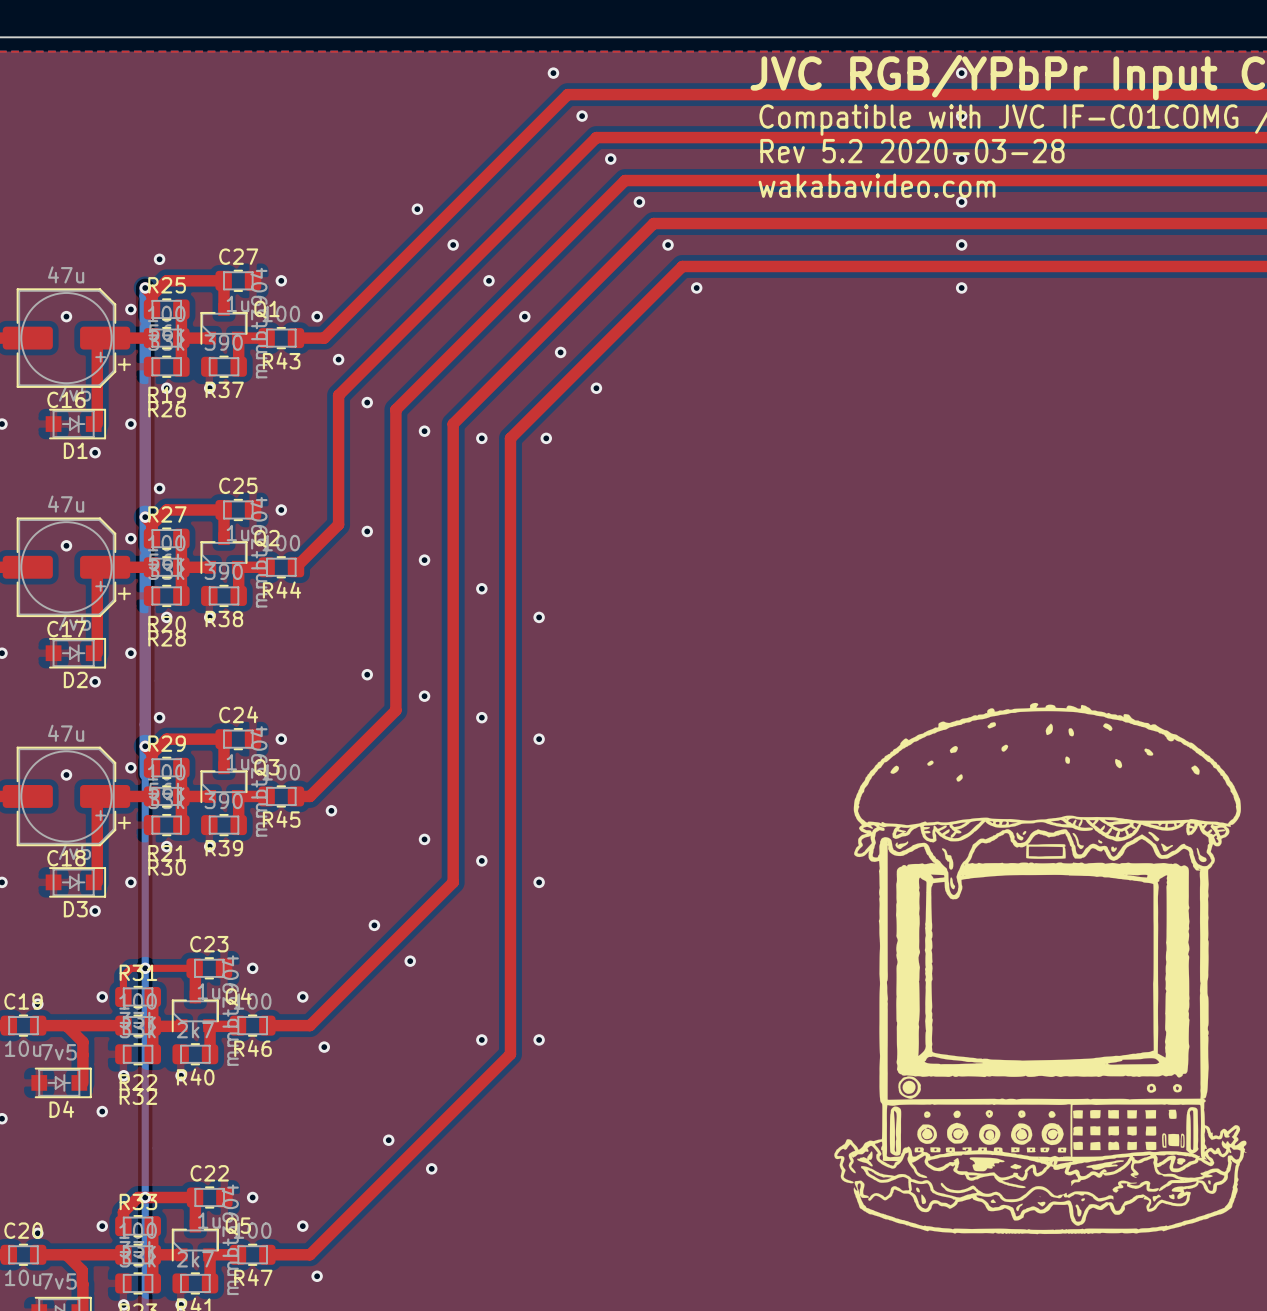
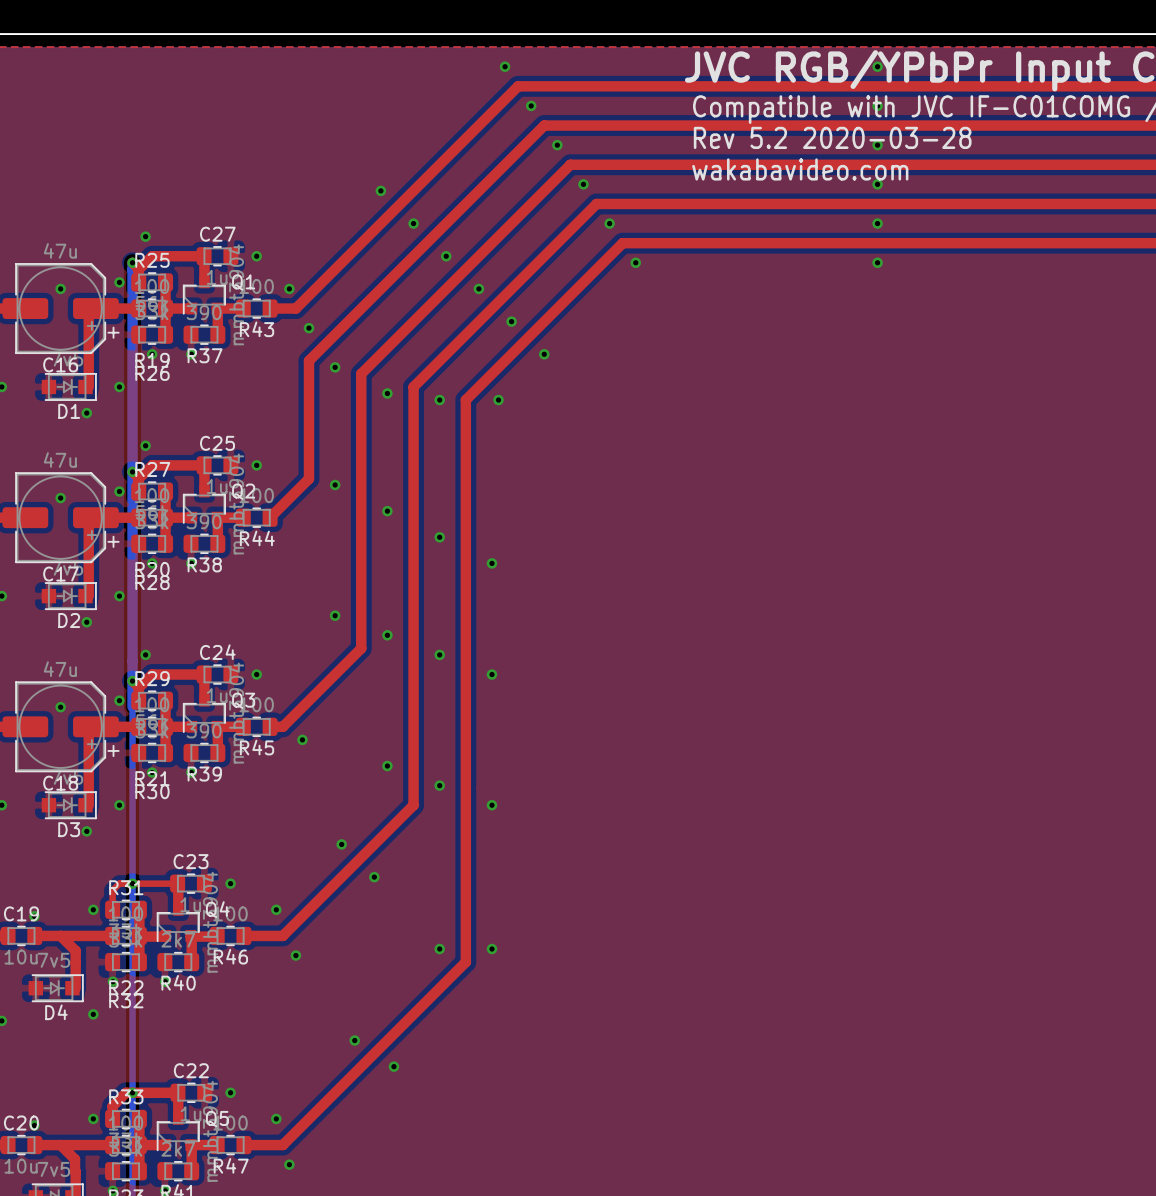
drawing: [834, 702, 1247, 1235] -> none

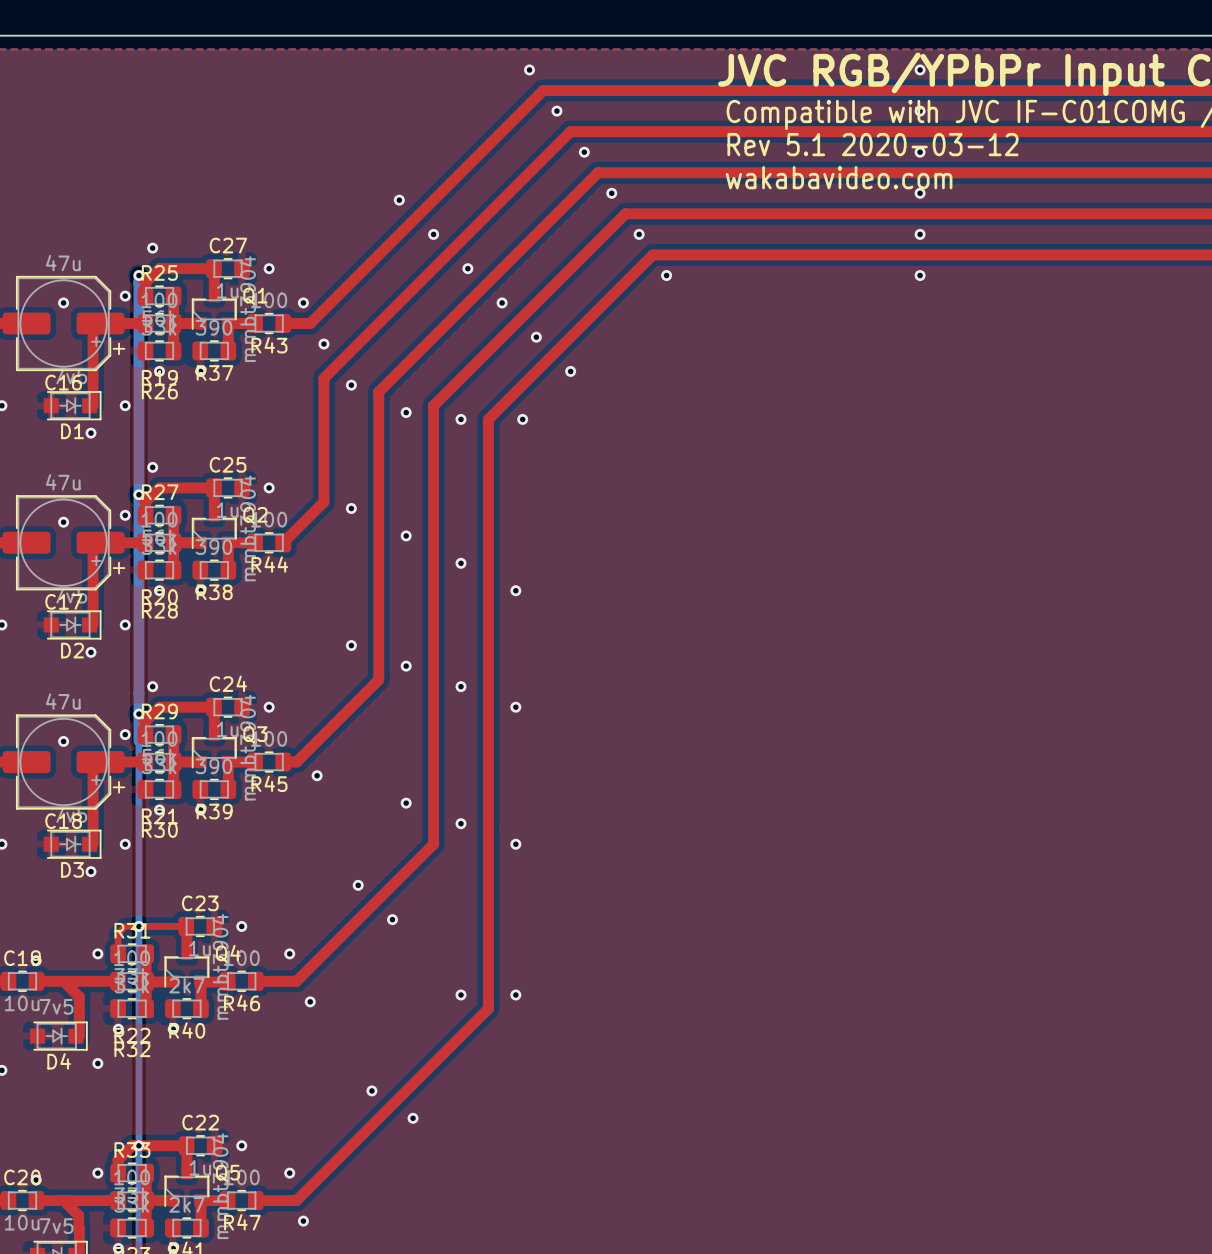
text: Rev 5.2 2020-03-28 (832, 137) -> Rev 5.1 2020-03-12 (873, 144)

